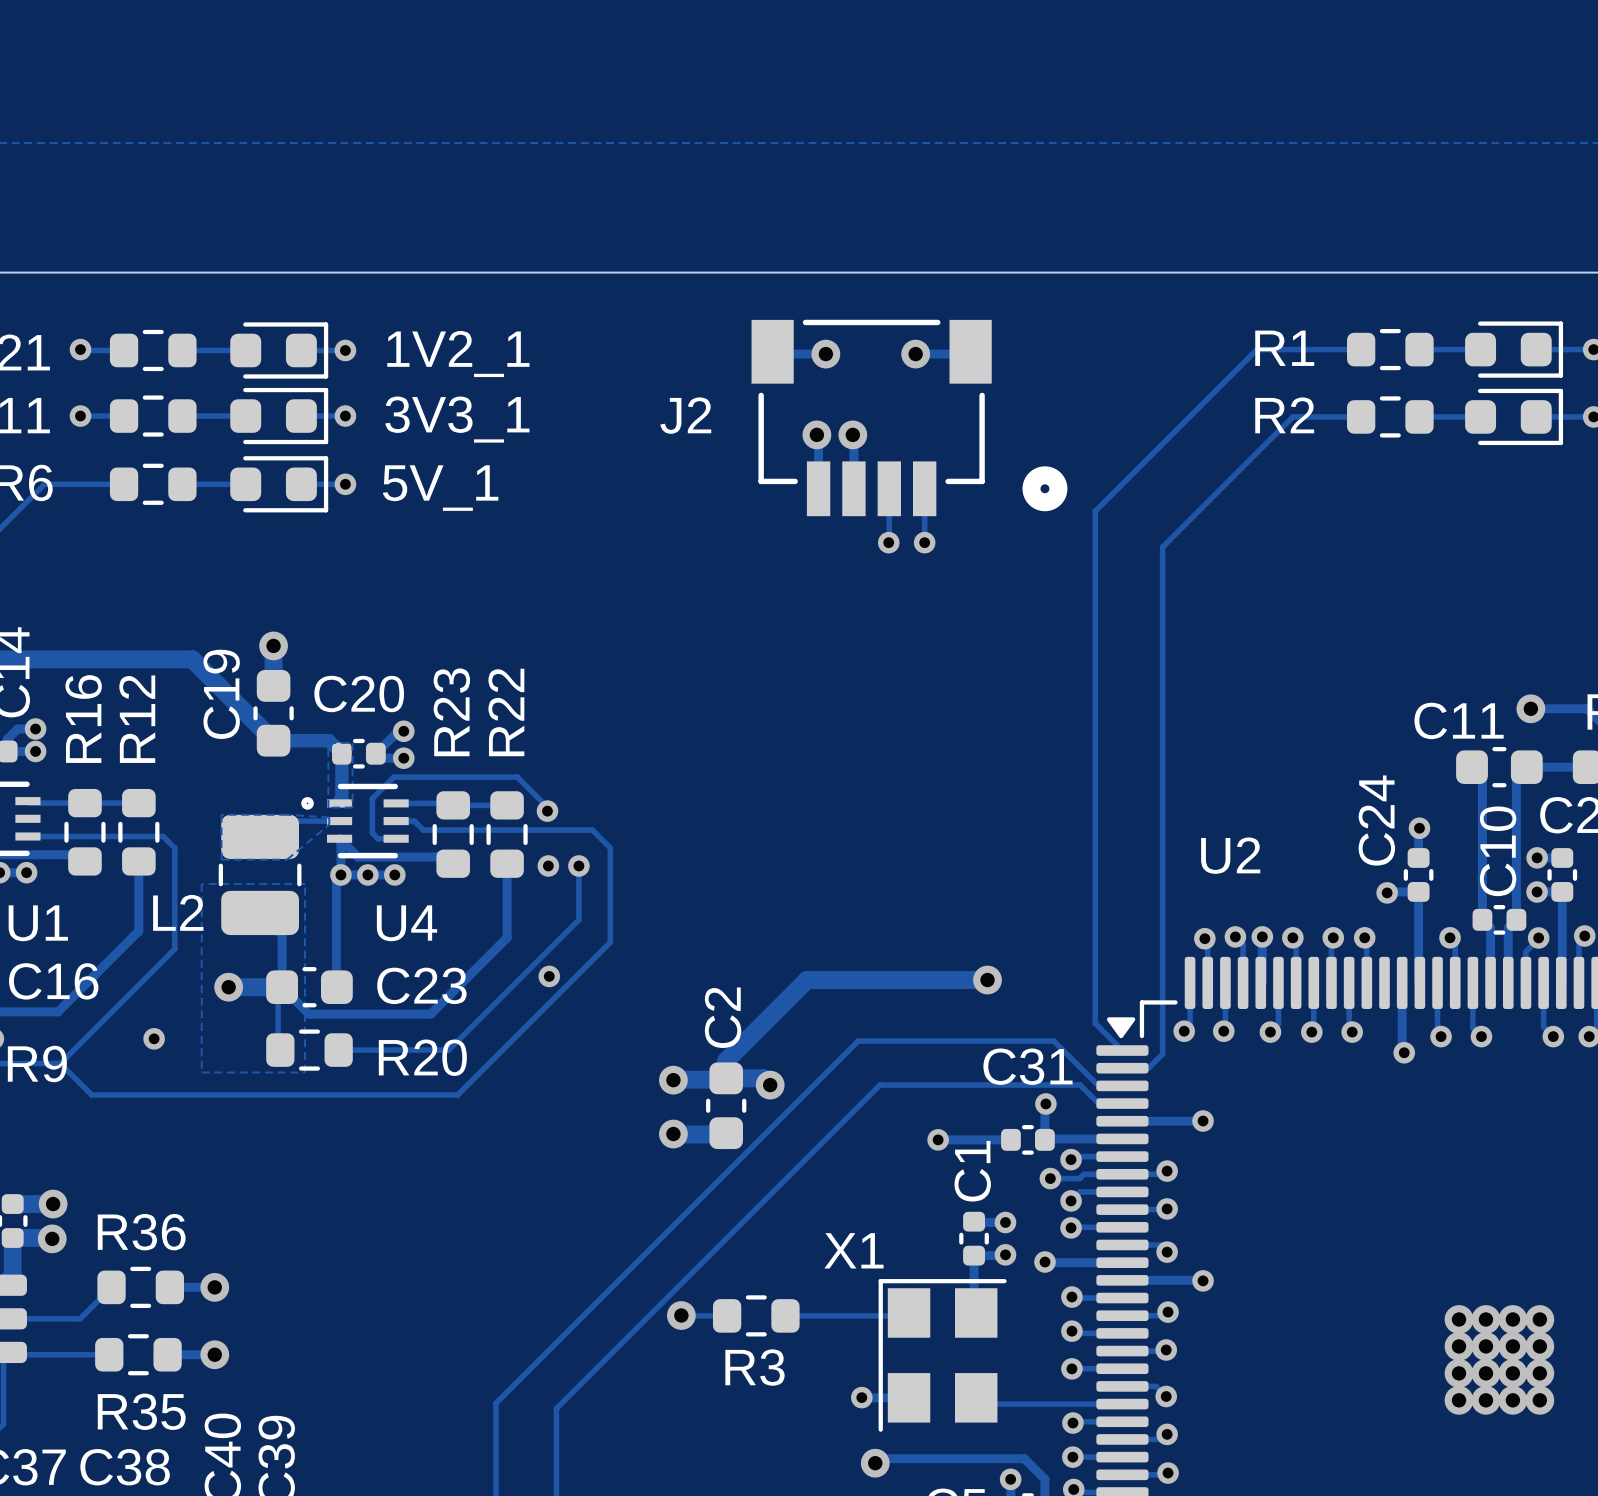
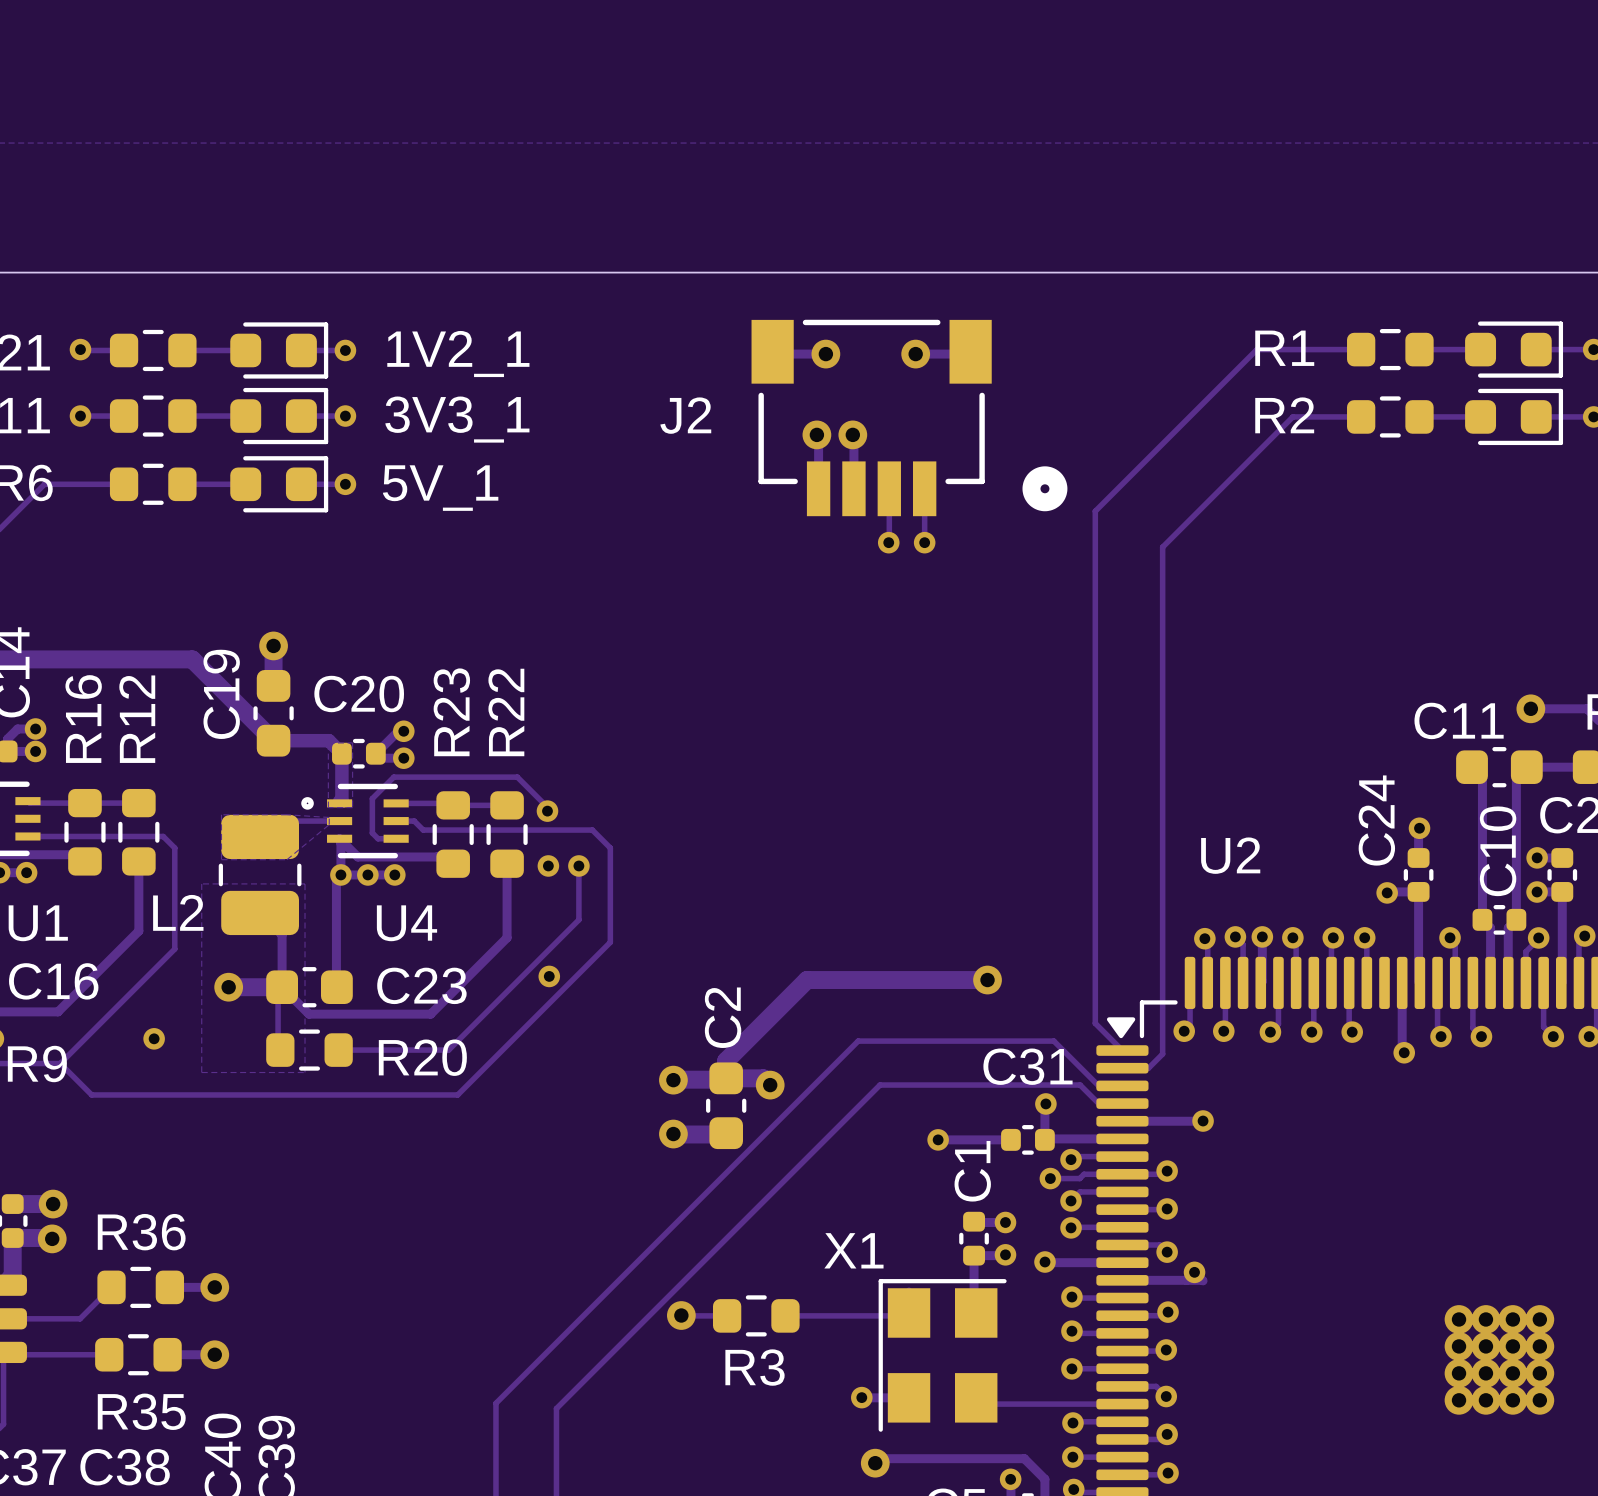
via position: (1203, 1280) -> (1194, 1272)

